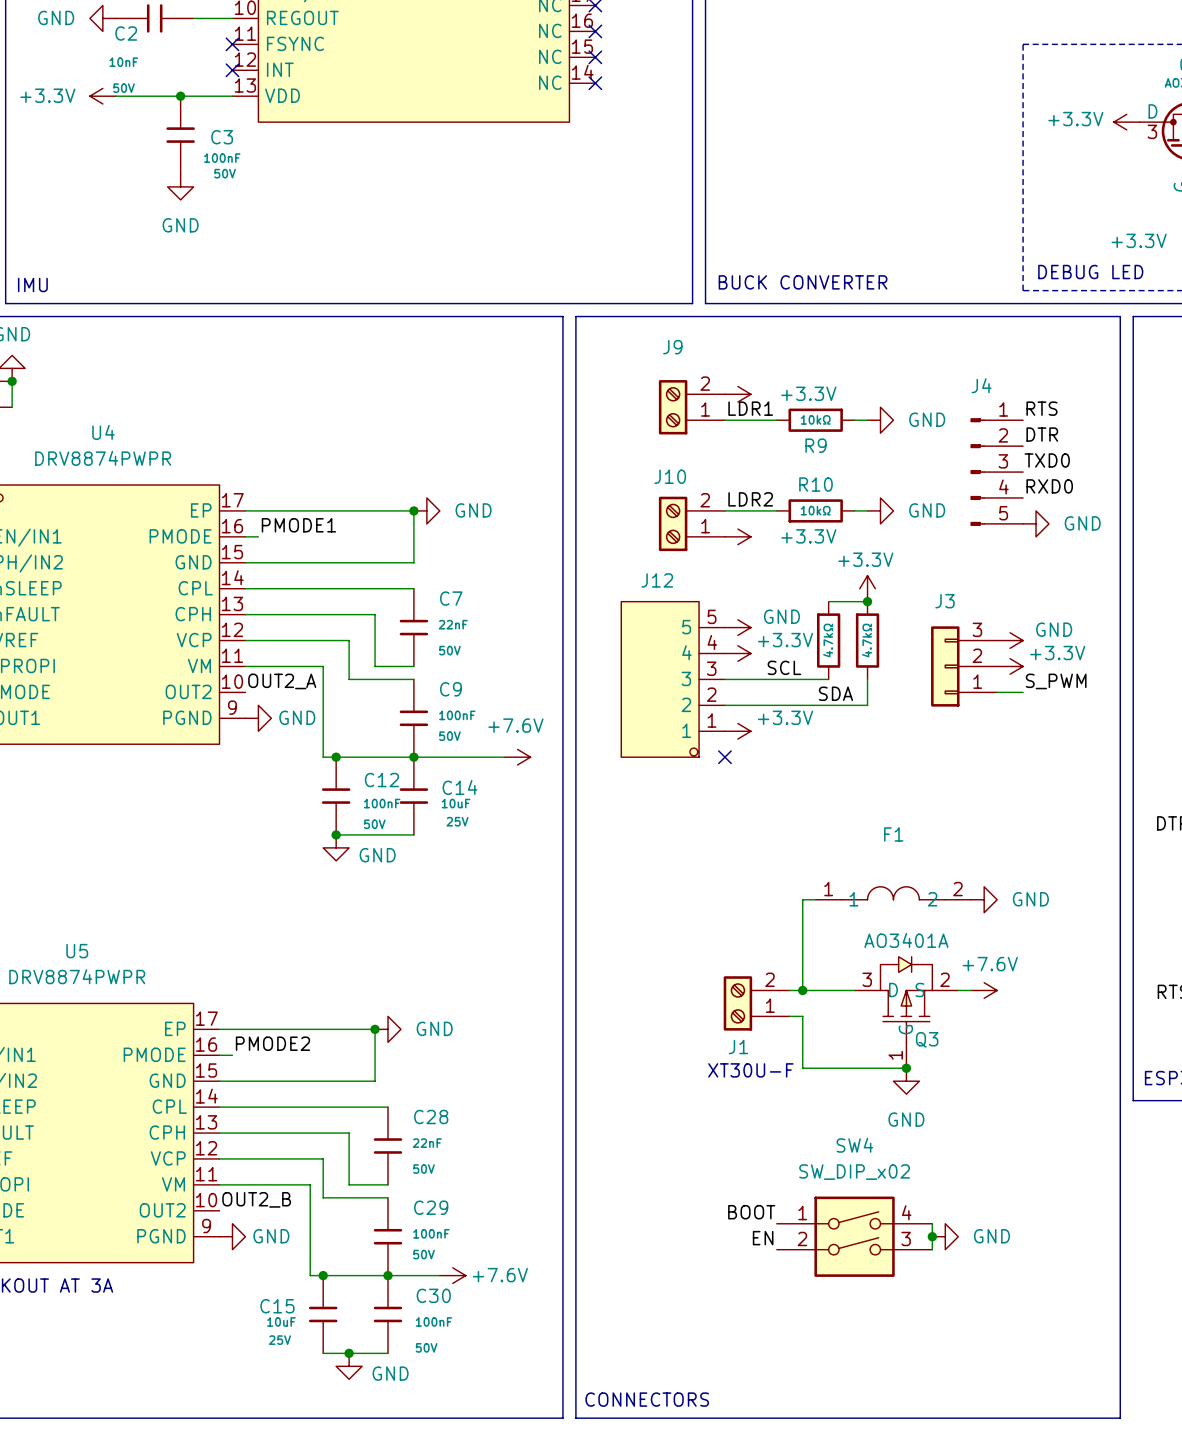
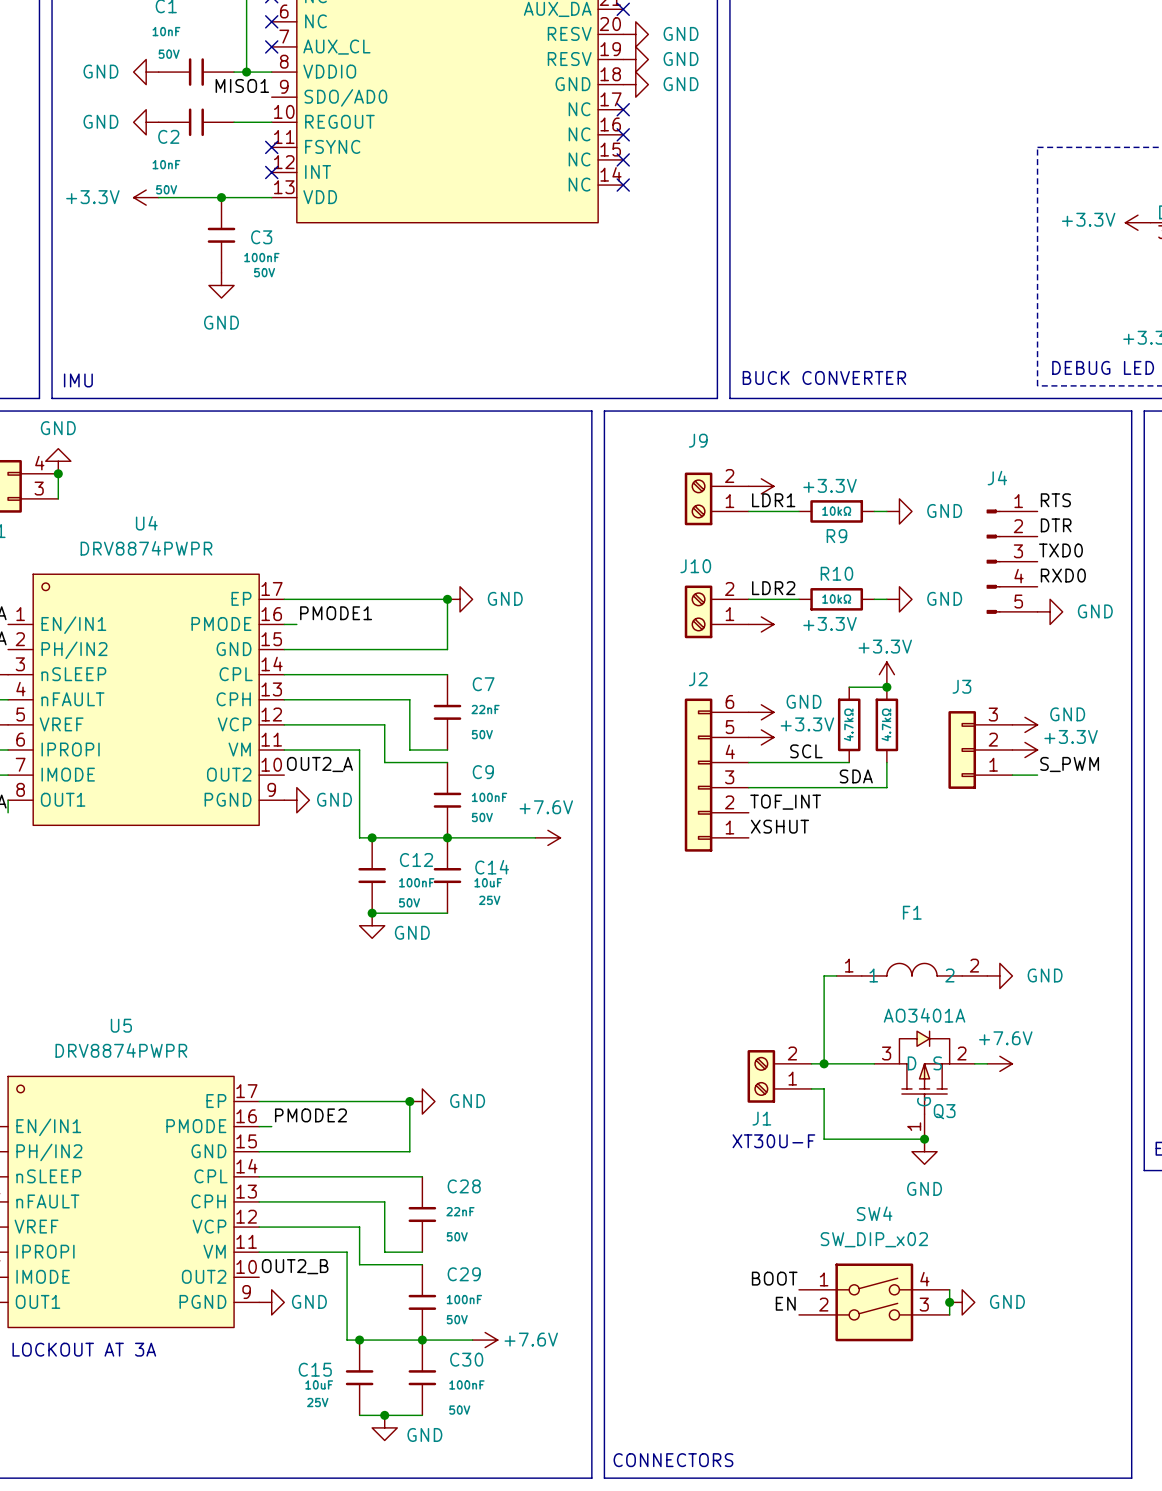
J12: (673, 679) -> none
J2: none -> (716, 775)
label: none -> TOF_INT (785, 802)
power symbol: +3.3V (737, 731) -> none
label: none -> XSHUT (779, 826)
no-connect mark: (724, 757) -> none

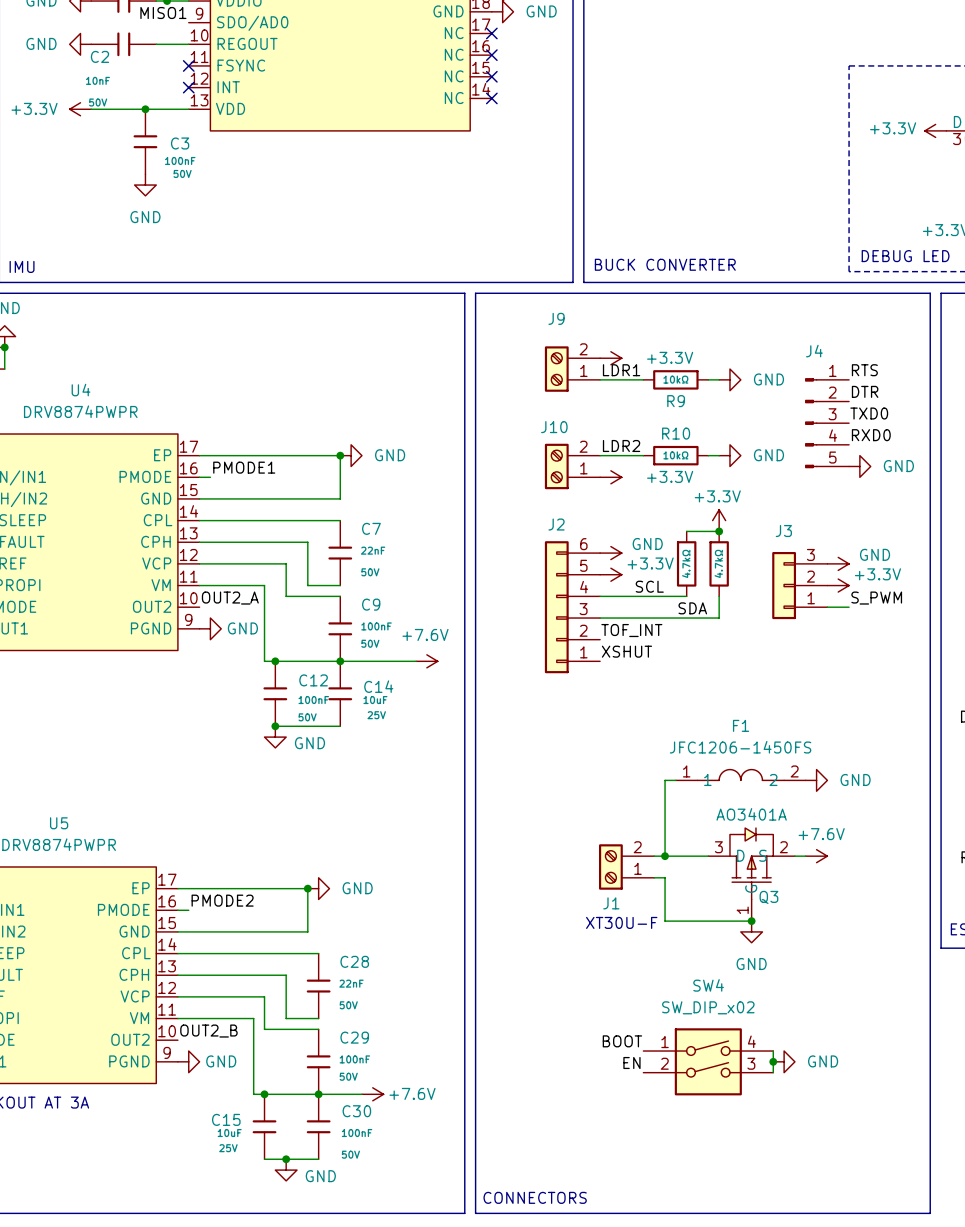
F1 value: none -> JFC1206-1450FS (740, 747)

